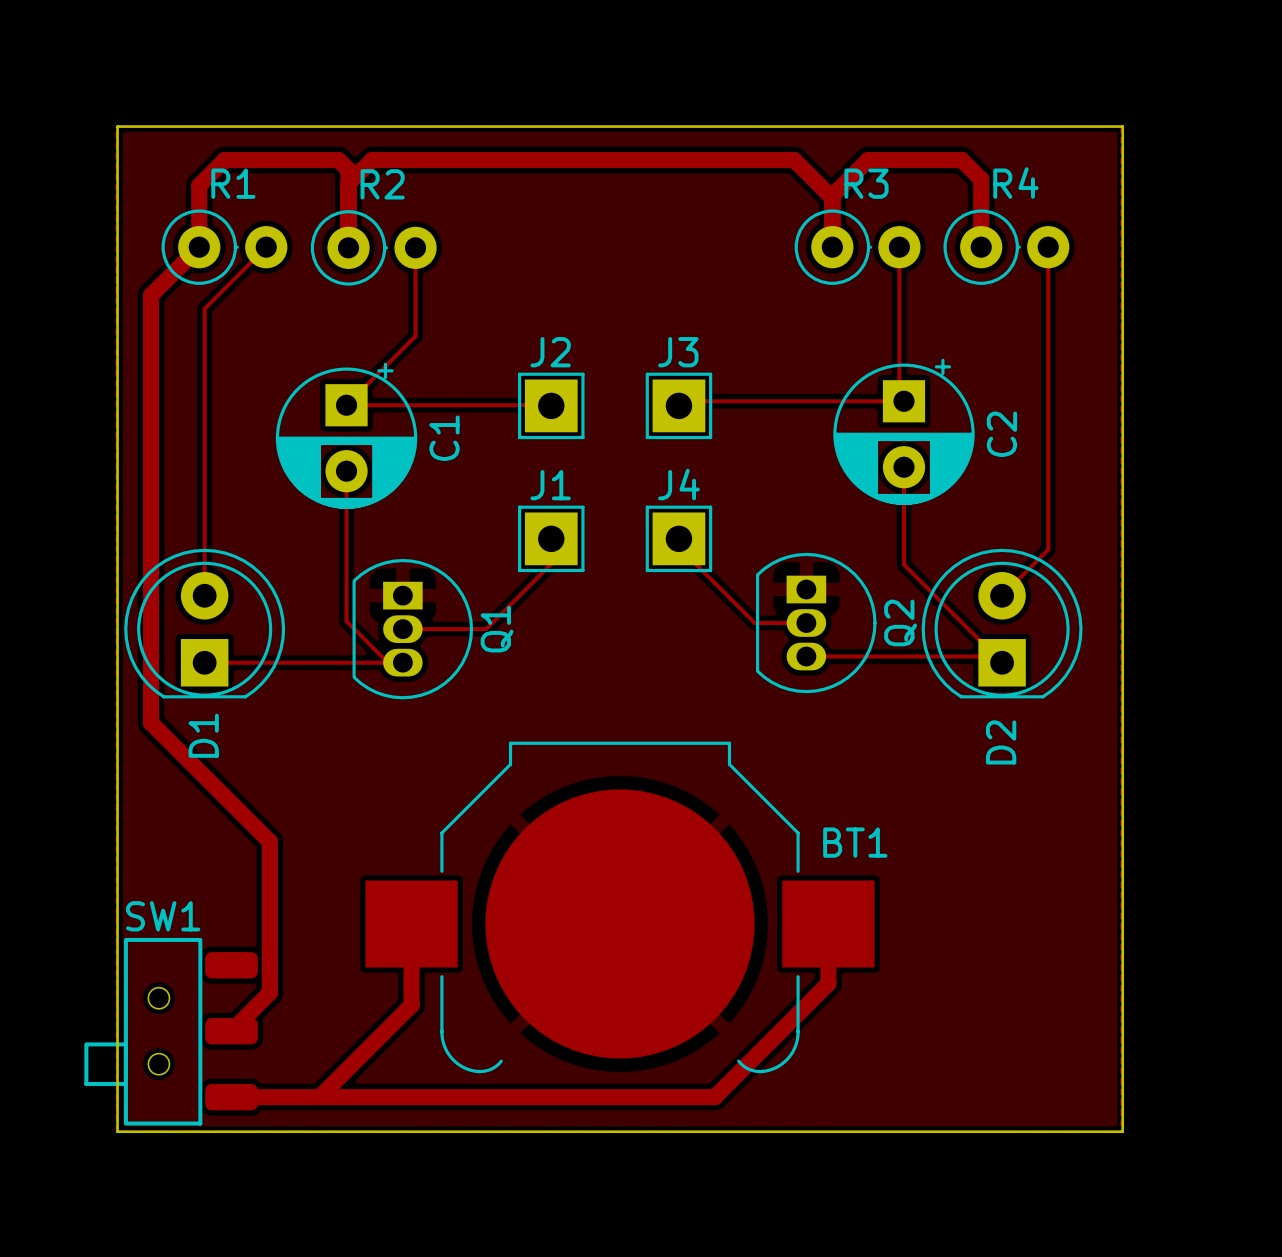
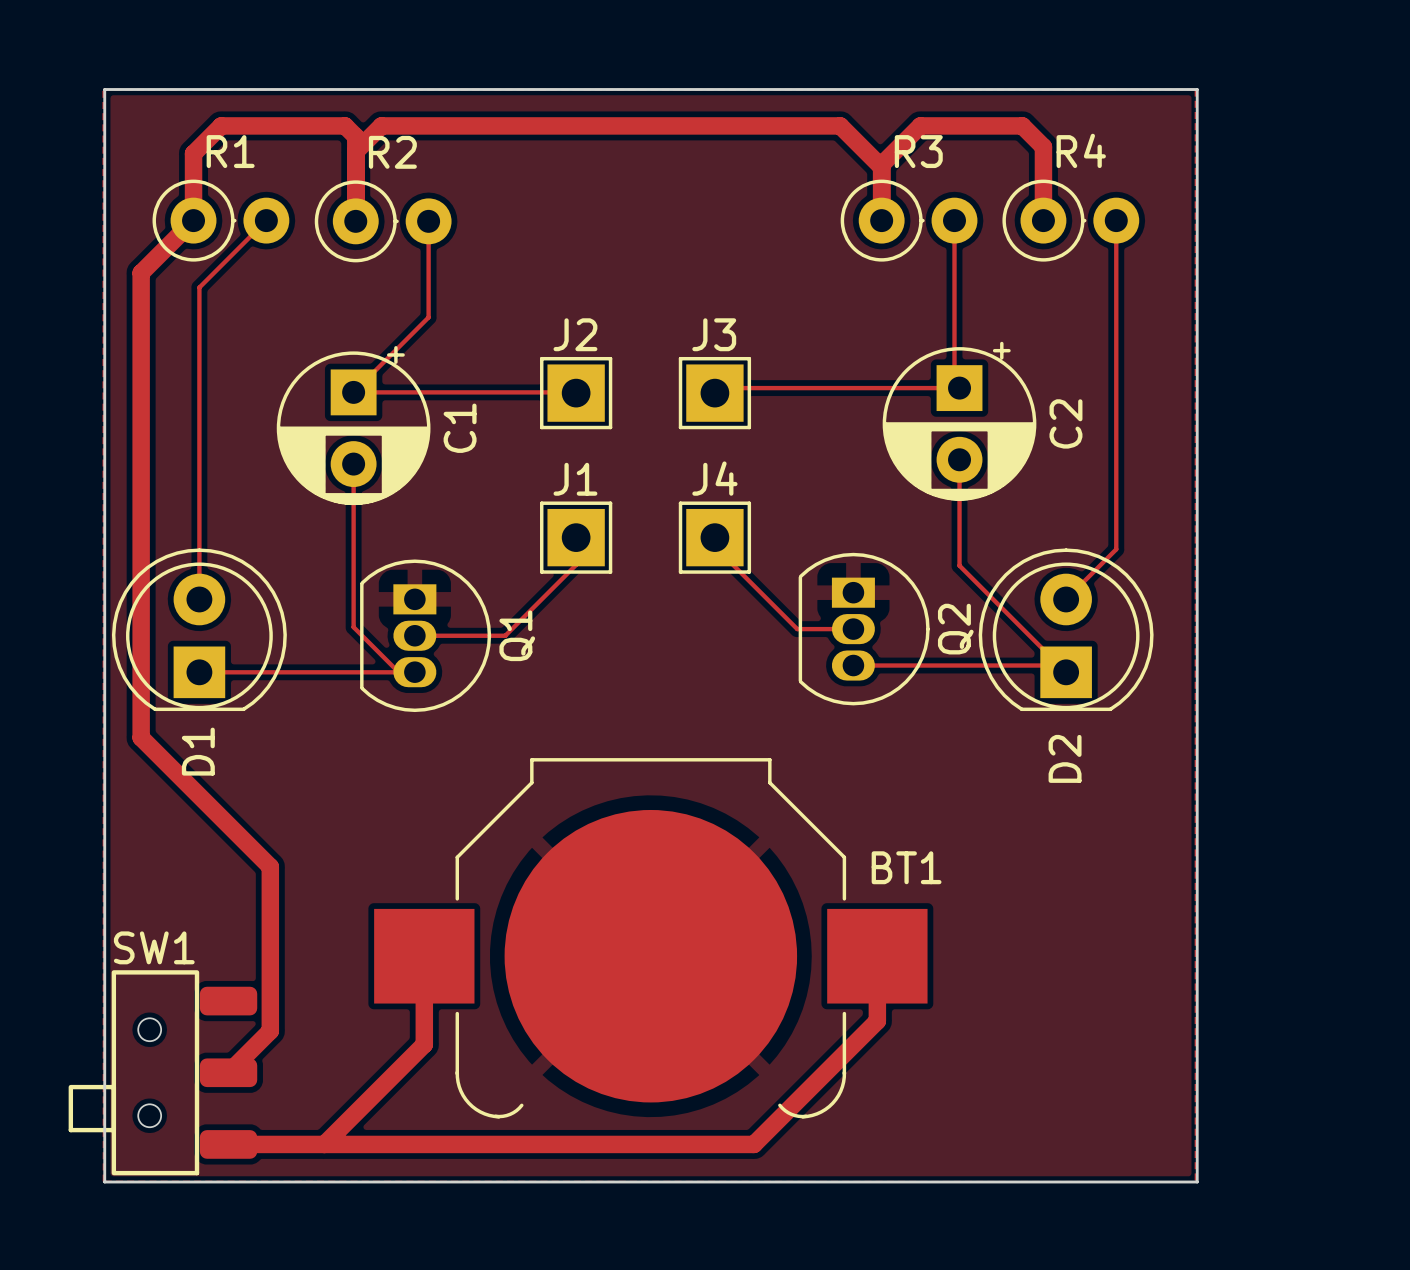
SW1 footprint: [84, 937, 258, 1126] -> [68, 970, 258, 1176]

